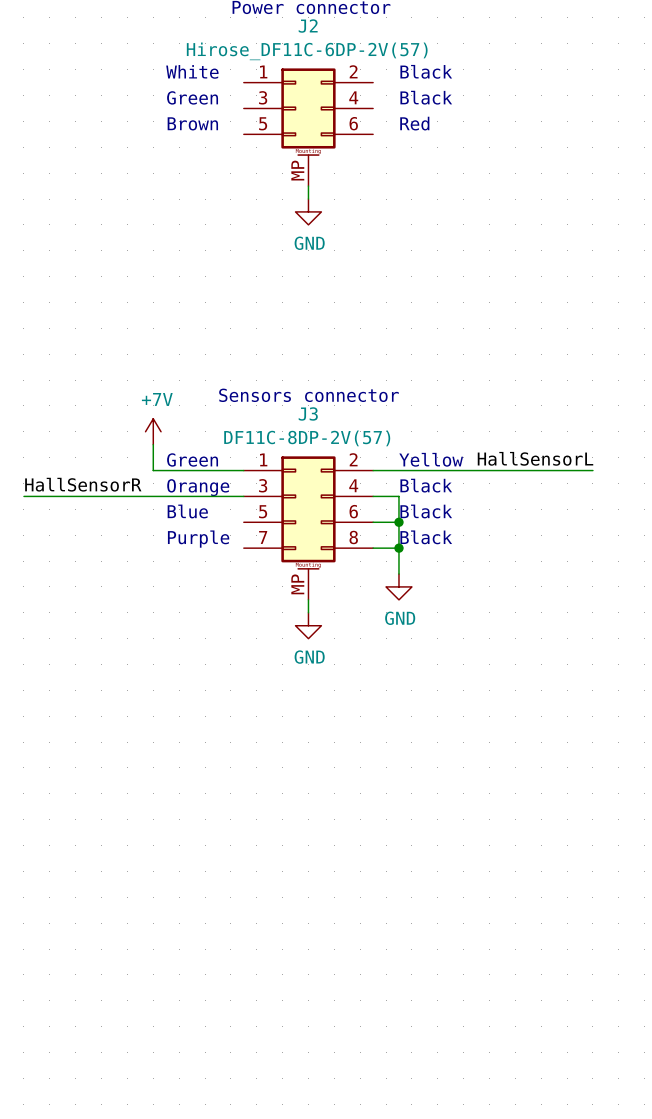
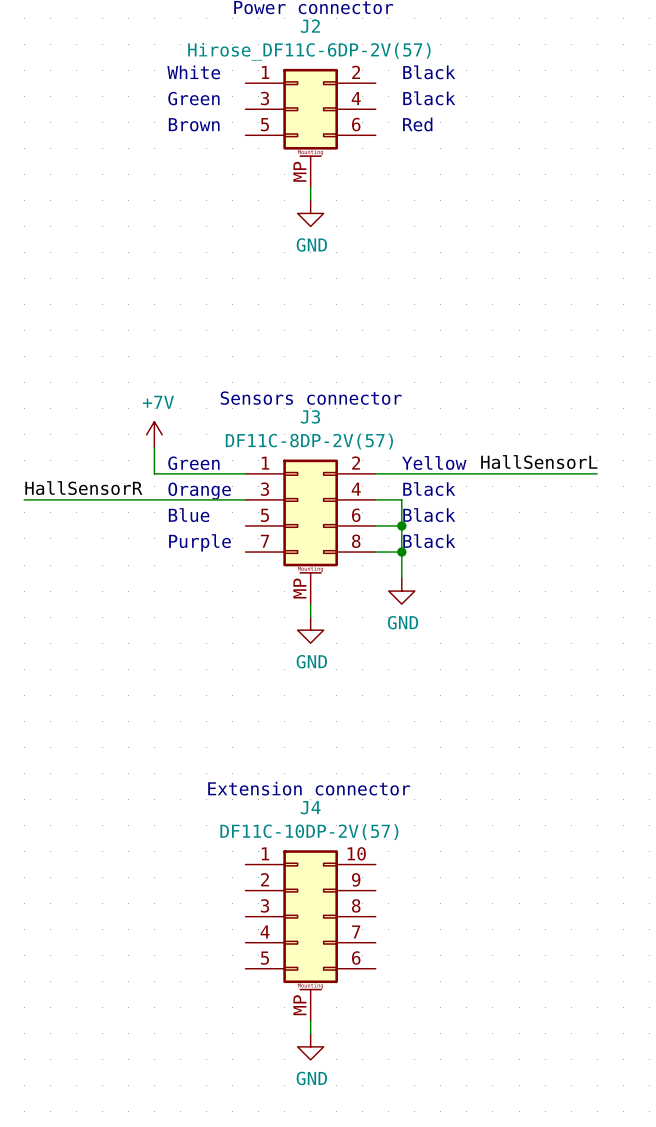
text: none -> Extension connector (309, 788)
J4: none -> DF11C-10DP-2V(57) (310, 935)
wire: none -> (310, 1020) (310, 1033)
power symbol: none -> GND (310, 1046)

